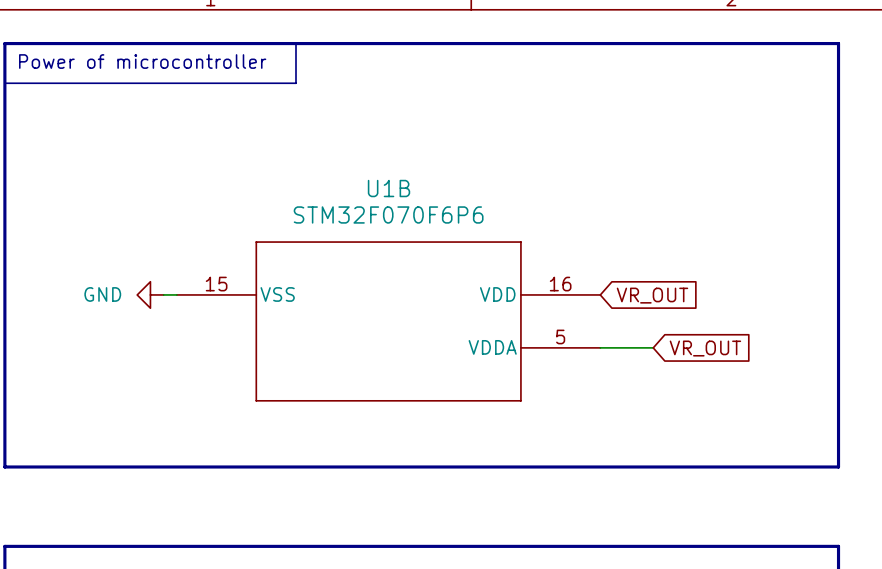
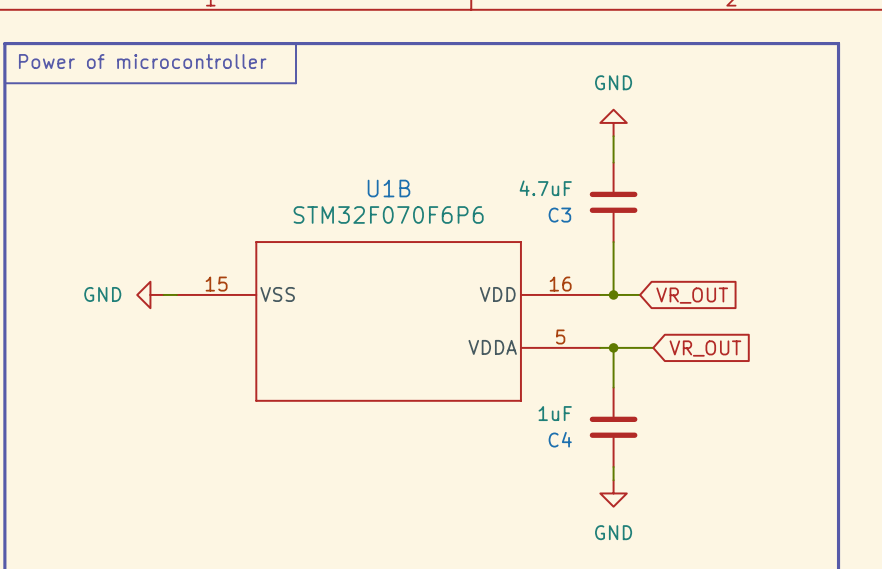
power symbol: none -> GND (613, 122)
wire: none -> (613, 136) (613, 162)
C3: none -> 4.7uF (613, 202)
wire: none -> (613, 242) (613, 294)
wire: none -> (600, 294) (640, 294)
junction: none -> (613, 294)
global label position: VR_OUT (652, 295) -> VR_OUT (692, 295)
wire: none -> (613, 347) (613, 387)
junction: none -> (613, 347)
C4: none -> 1uF (613, 427)
line: (4, 466) (838, 466) -> (4, 466) (4, 546)
wire: none -> (613, 466) (613, 480)
power symbol: none -> GND (613, 493)
line: (4, 546) (838, 546) -> (838, 466) (838, 546)

